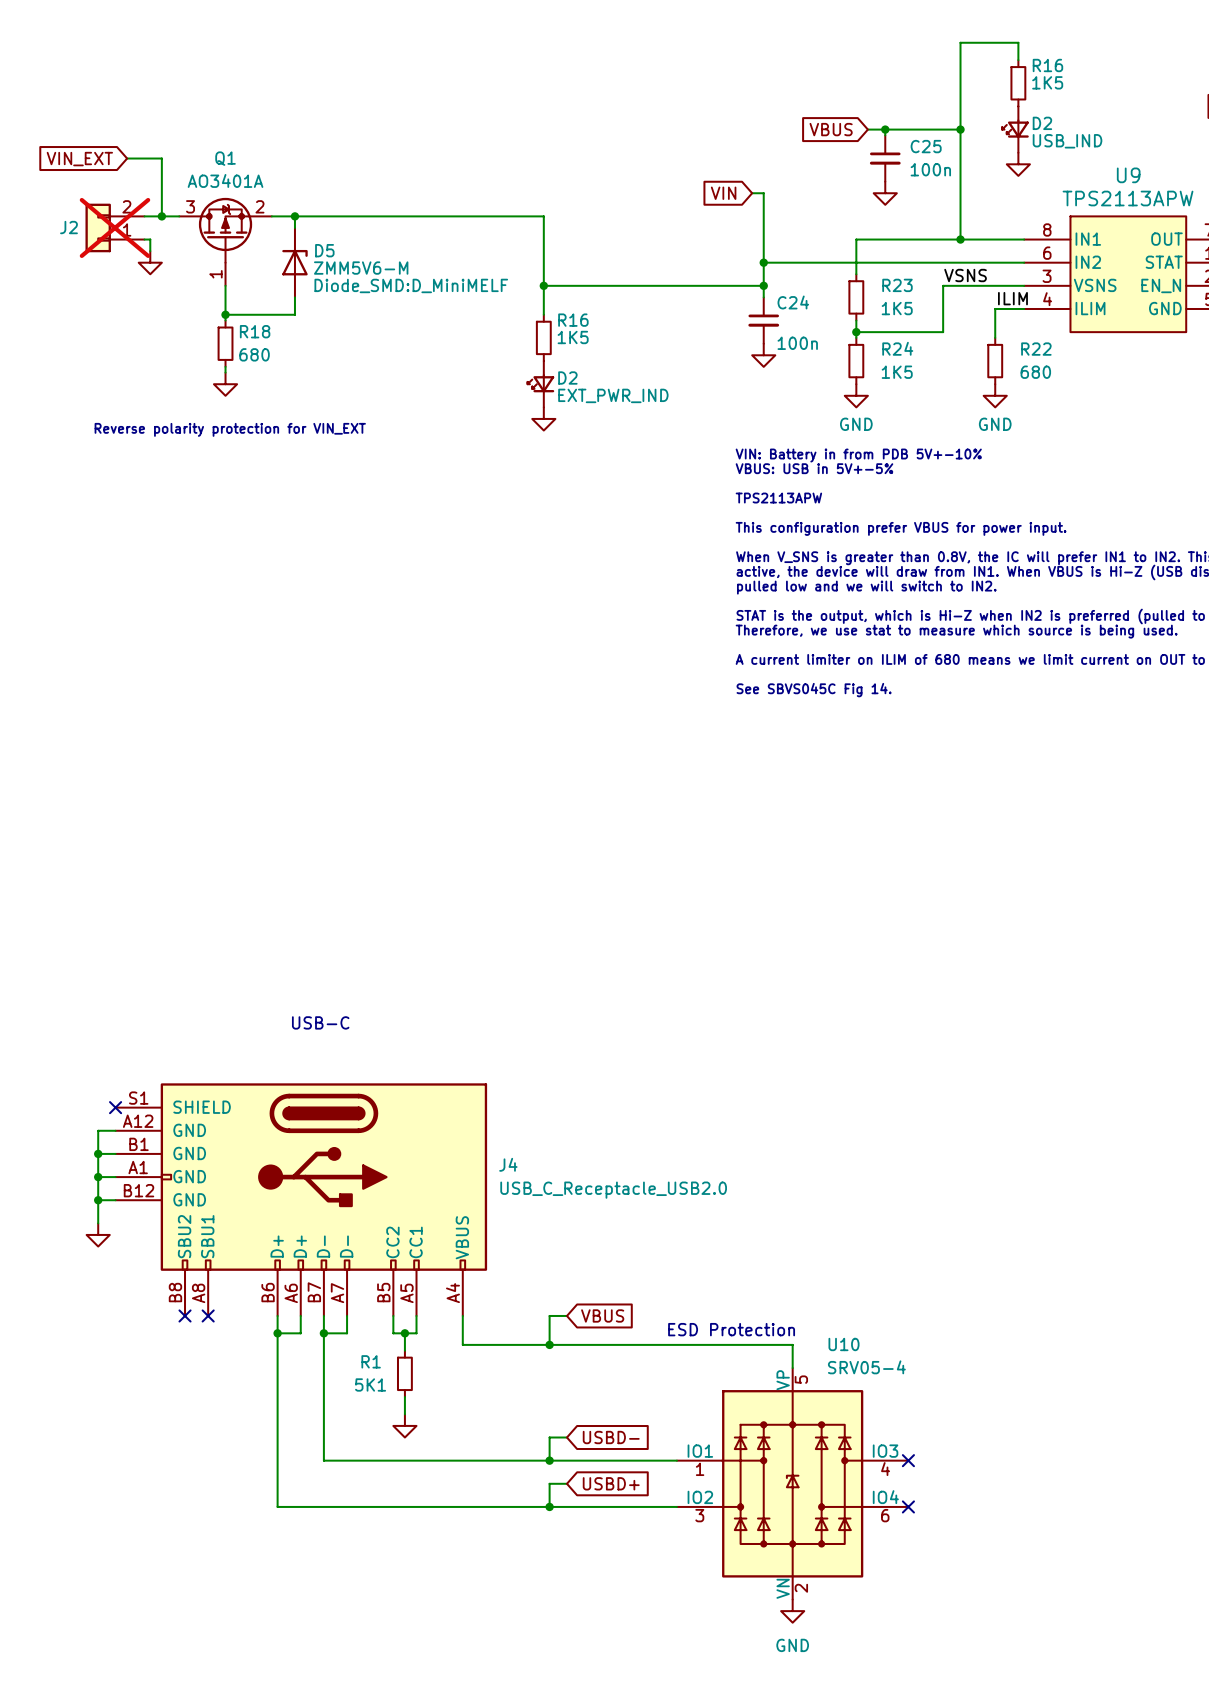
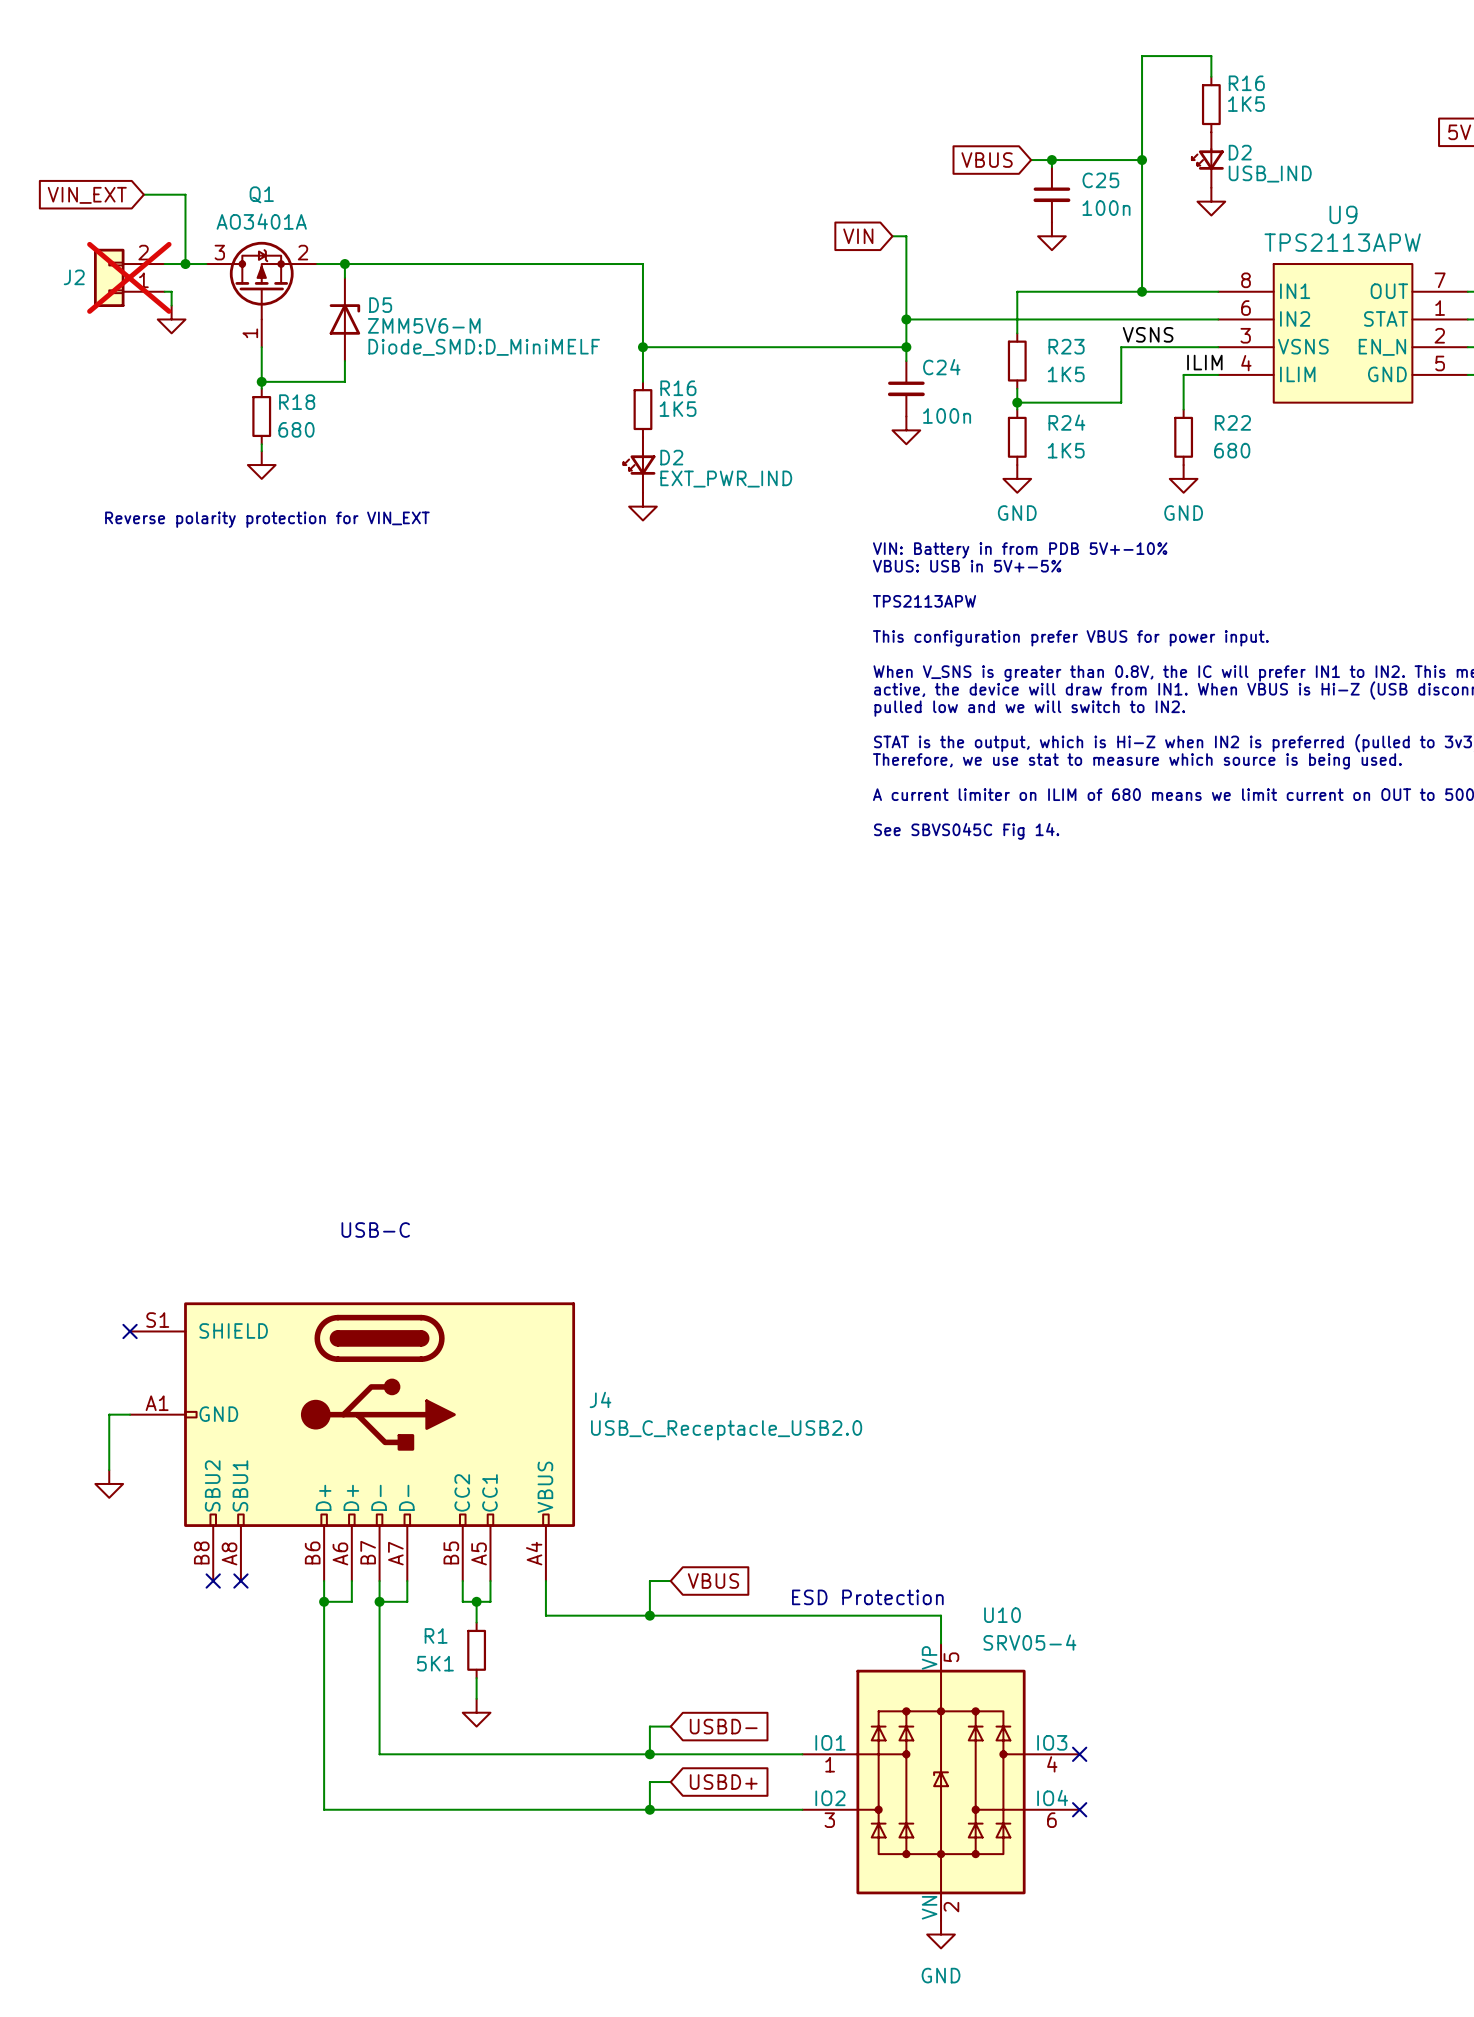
J4 symbol: [115, 1083, 488, 1316] -> [130, 1302, 576, 1582]
wire: (115, 1130) (98, 1130) (98, 1177) -> none
wire: (98, 1153) (115, 1153) -> none
junction: (98, 1153) -> none
junction: (98, 1177) -> none
wire: (98, 1200) (115, 1200) -> none
junction: (98, 1200) -> none

